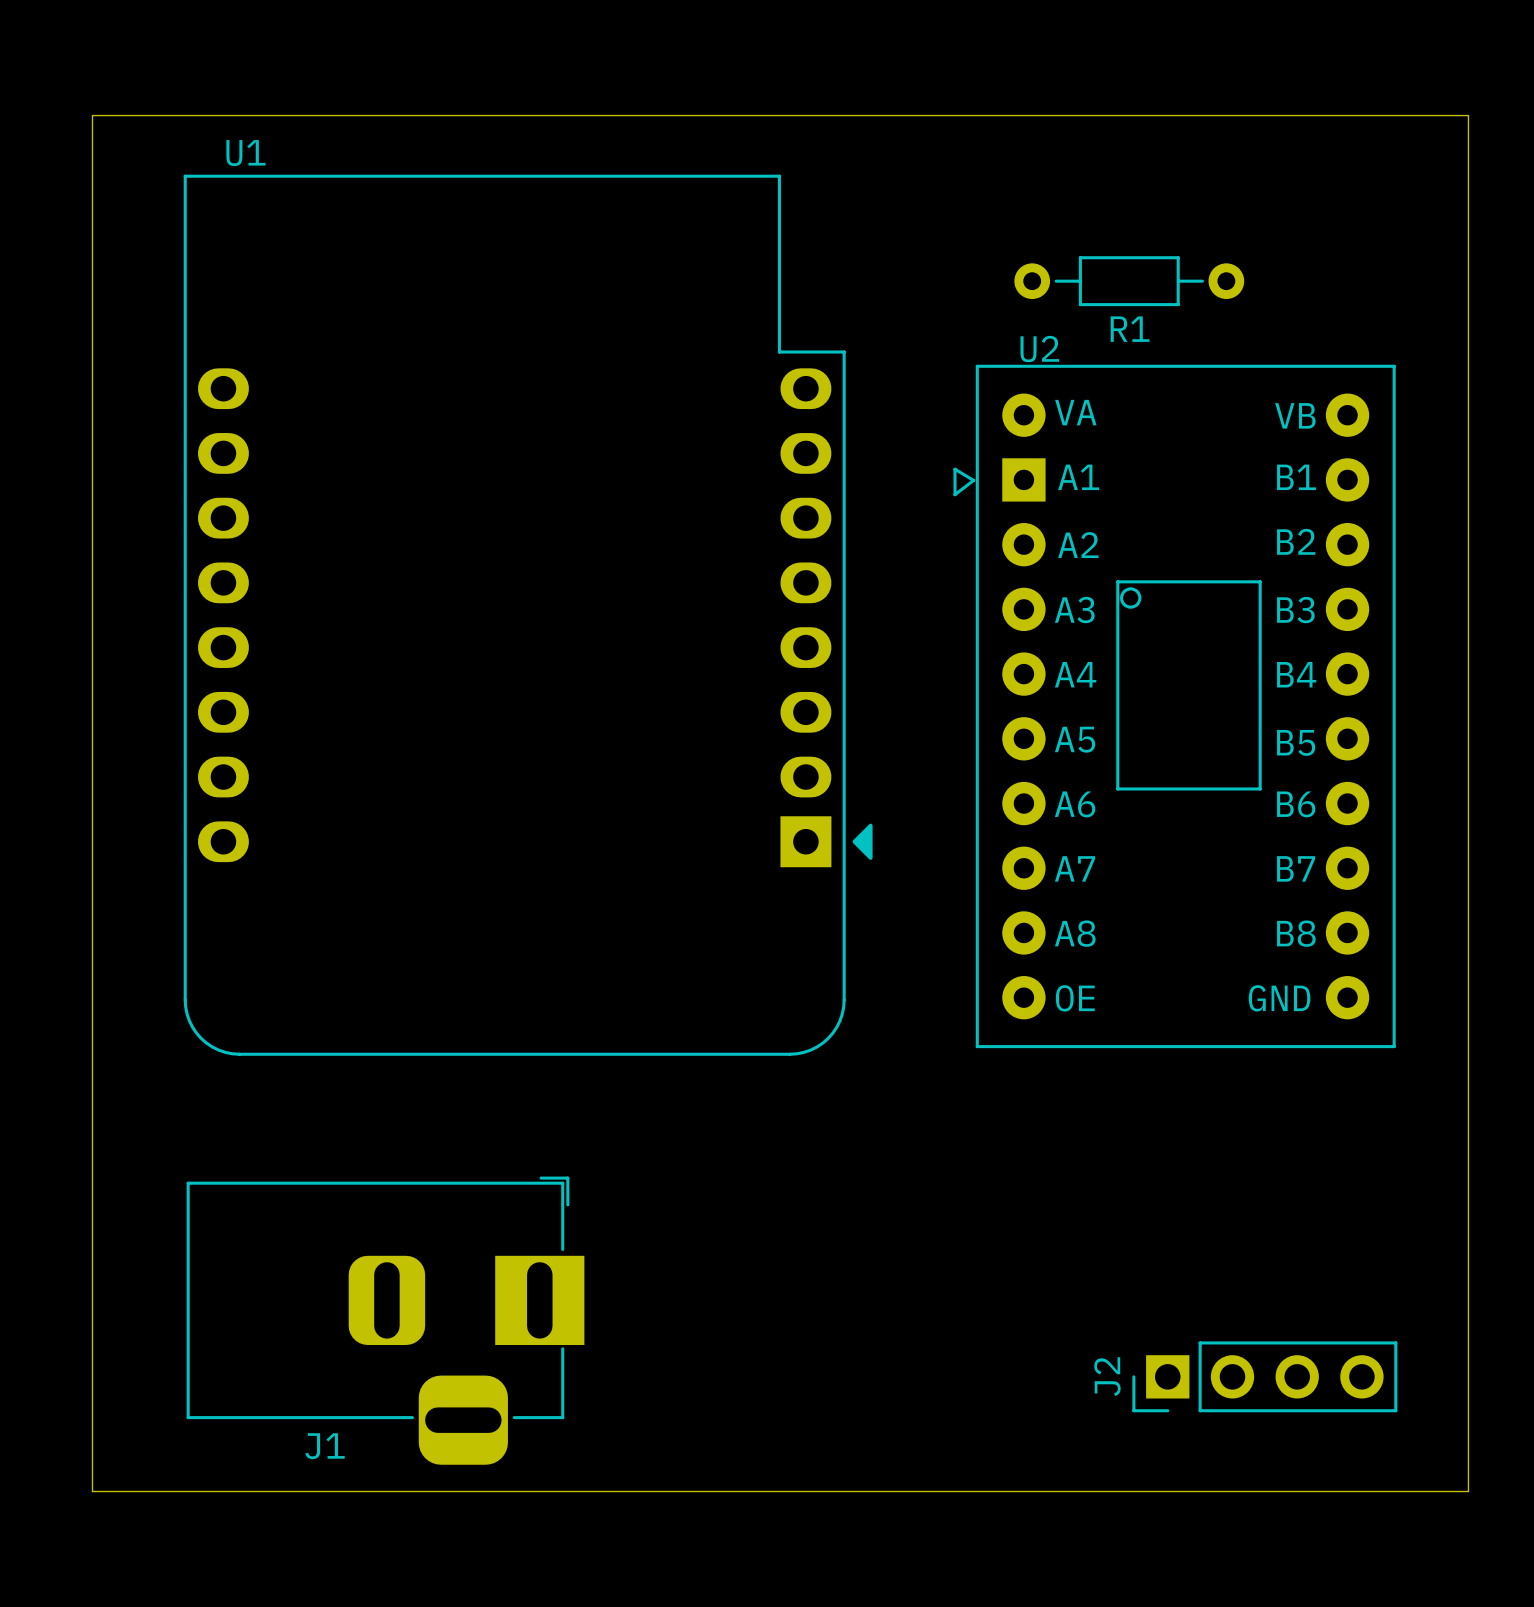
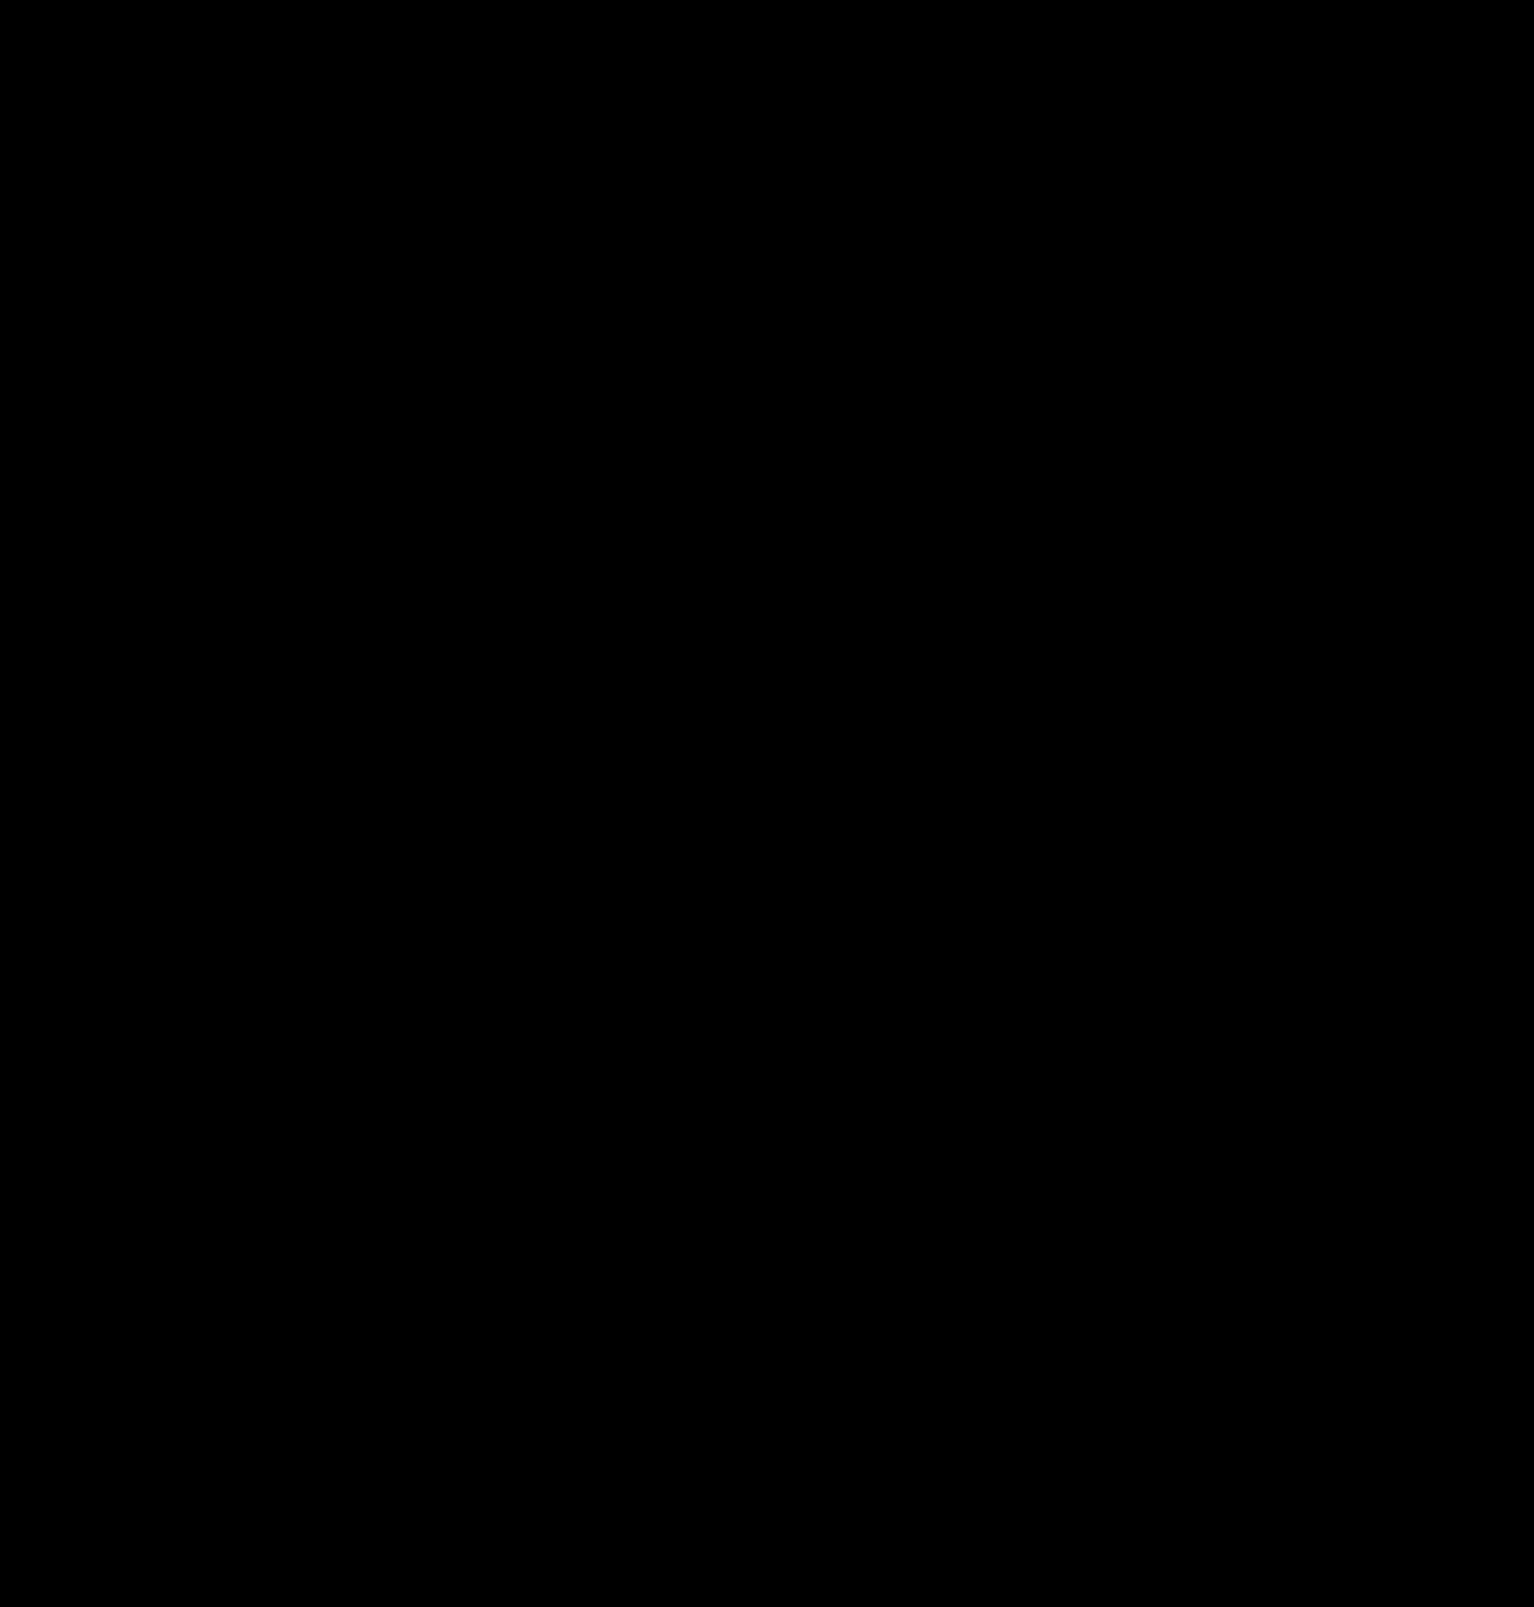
board edge: (92, 115) (1468, 115) (1468, 1491) (92, 1491) (92, 115) -> none
R1: (1129, 281) -> none
U1: (528, 615) -> none
U2: (1174, 706) -> none
J1: (385, 1320) -> none
J2: (1264, 1376) -> none

